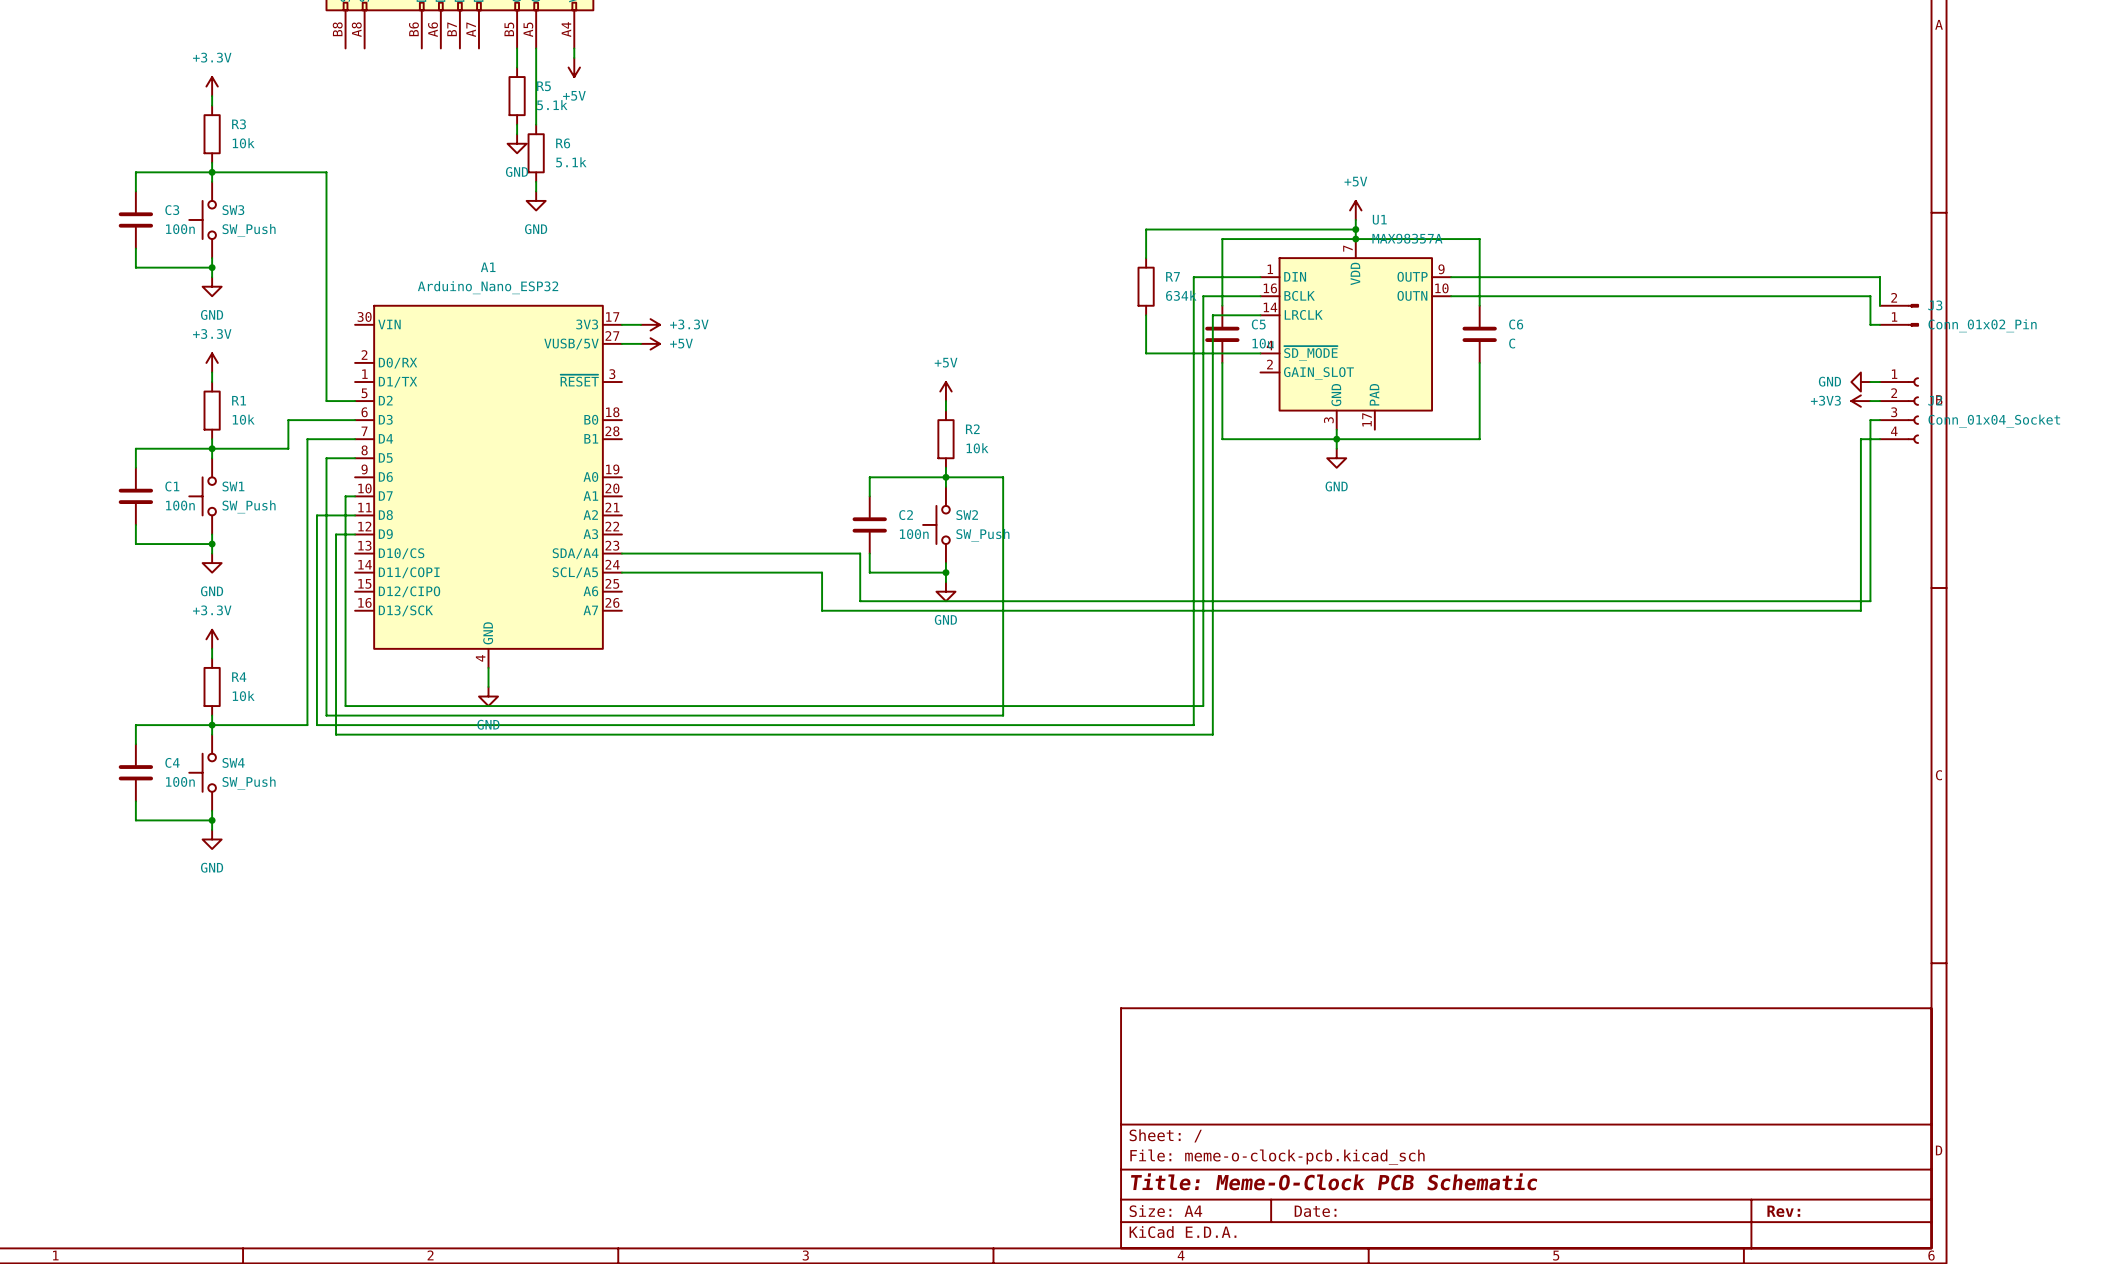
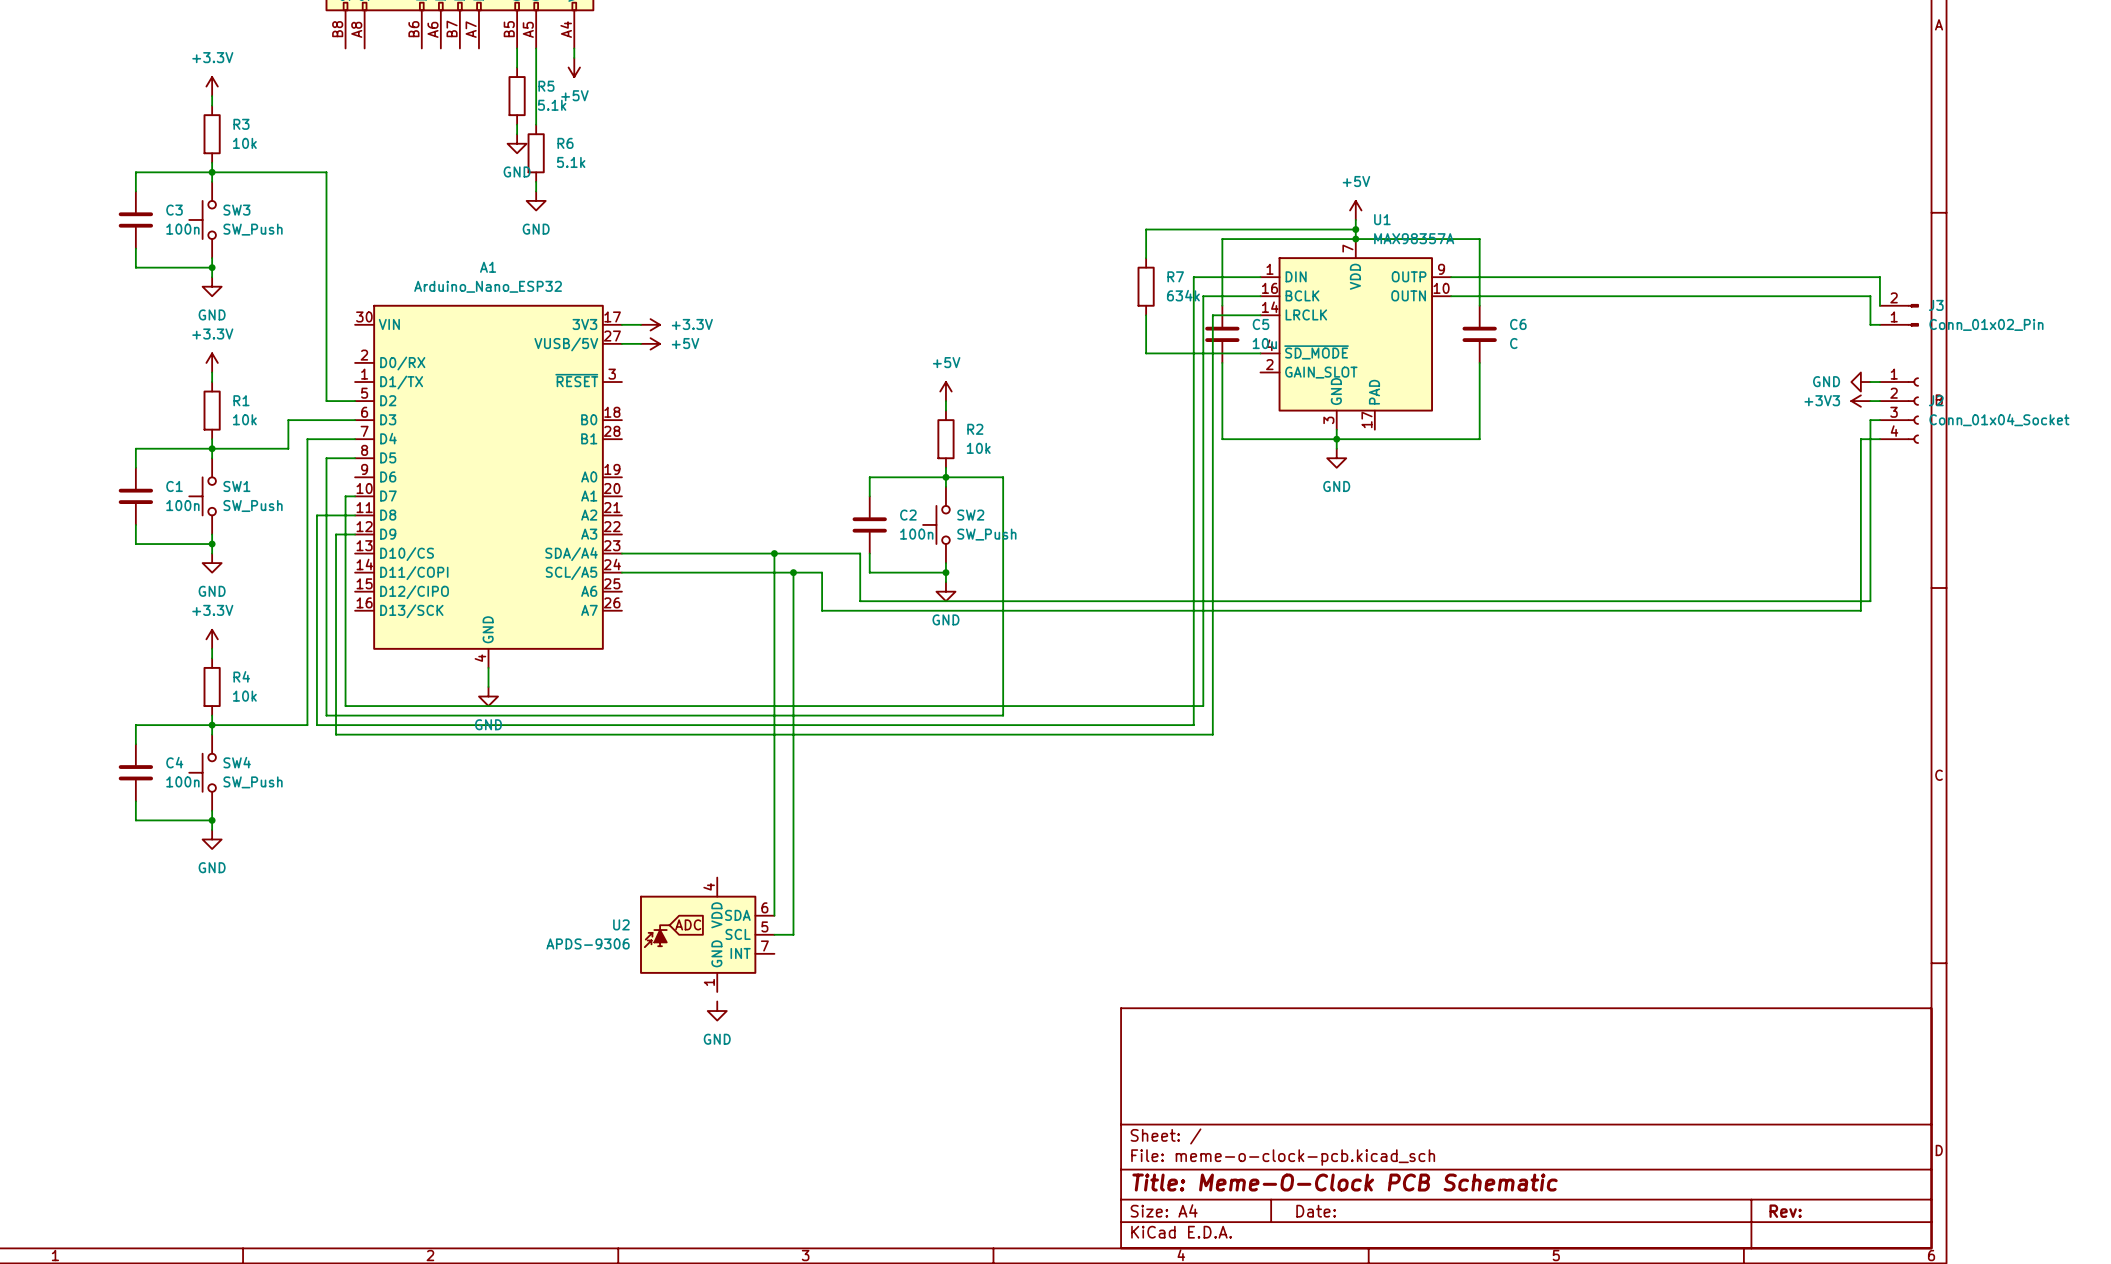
wire: none -> (774, 553) (774, 915)
junction: none -> (774, 553)
wire: none -> (793, 572) (793, 934) (774, 934)
junction: none -> (793, 572)
U2: none -> APDS-9306 (707, 934)
power symbol: none -> GND (717, 1011)

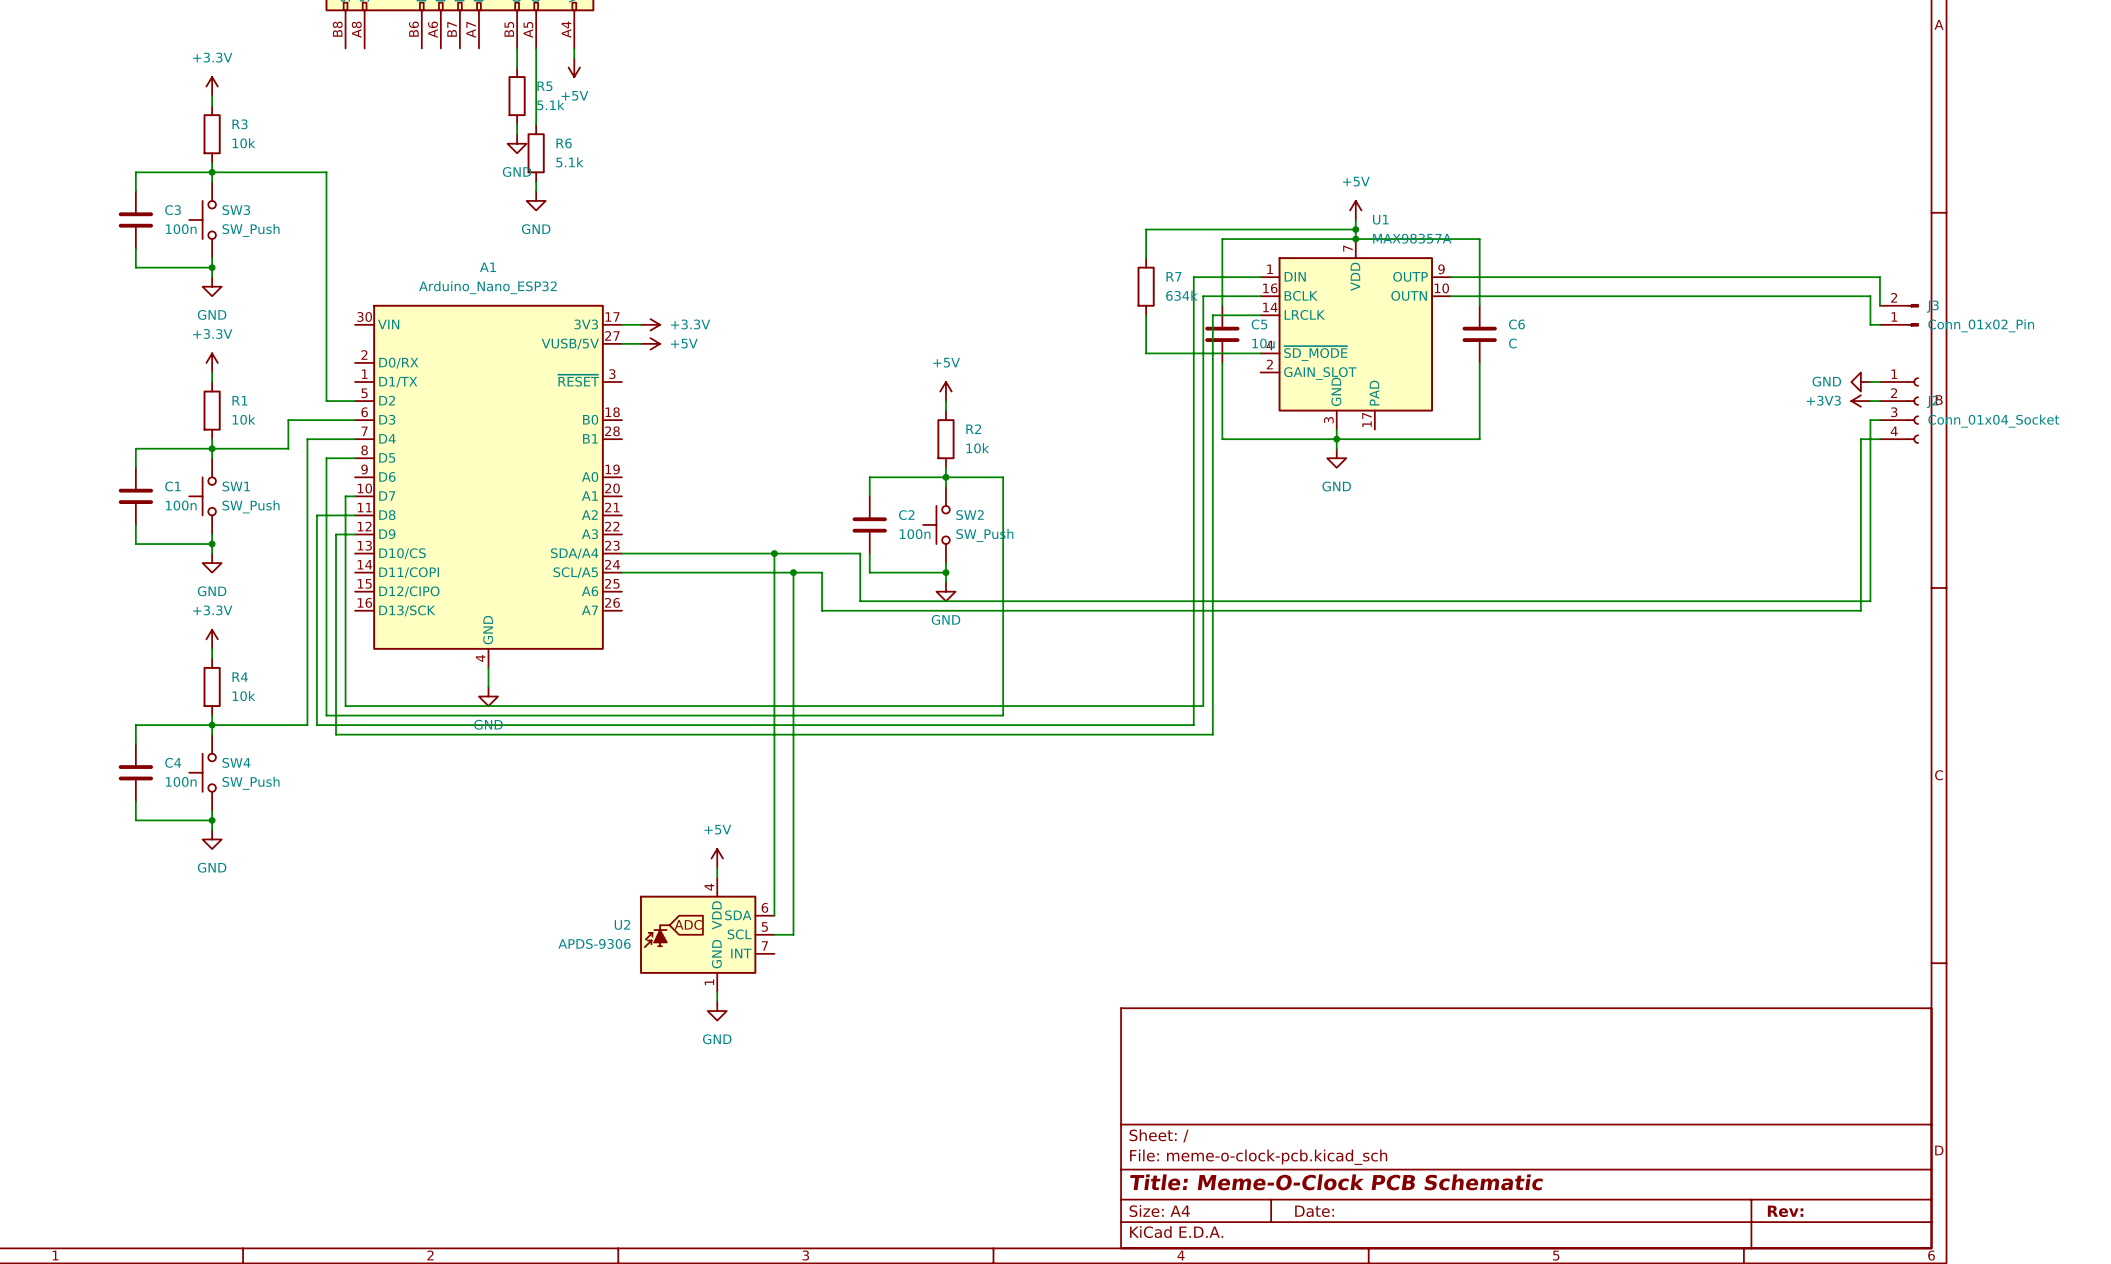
power symbol: none -> +5V (717, 858)
wire: none -> (717, 868) (717, 877)
wire: none -> (717, 991) (717, 1001)

